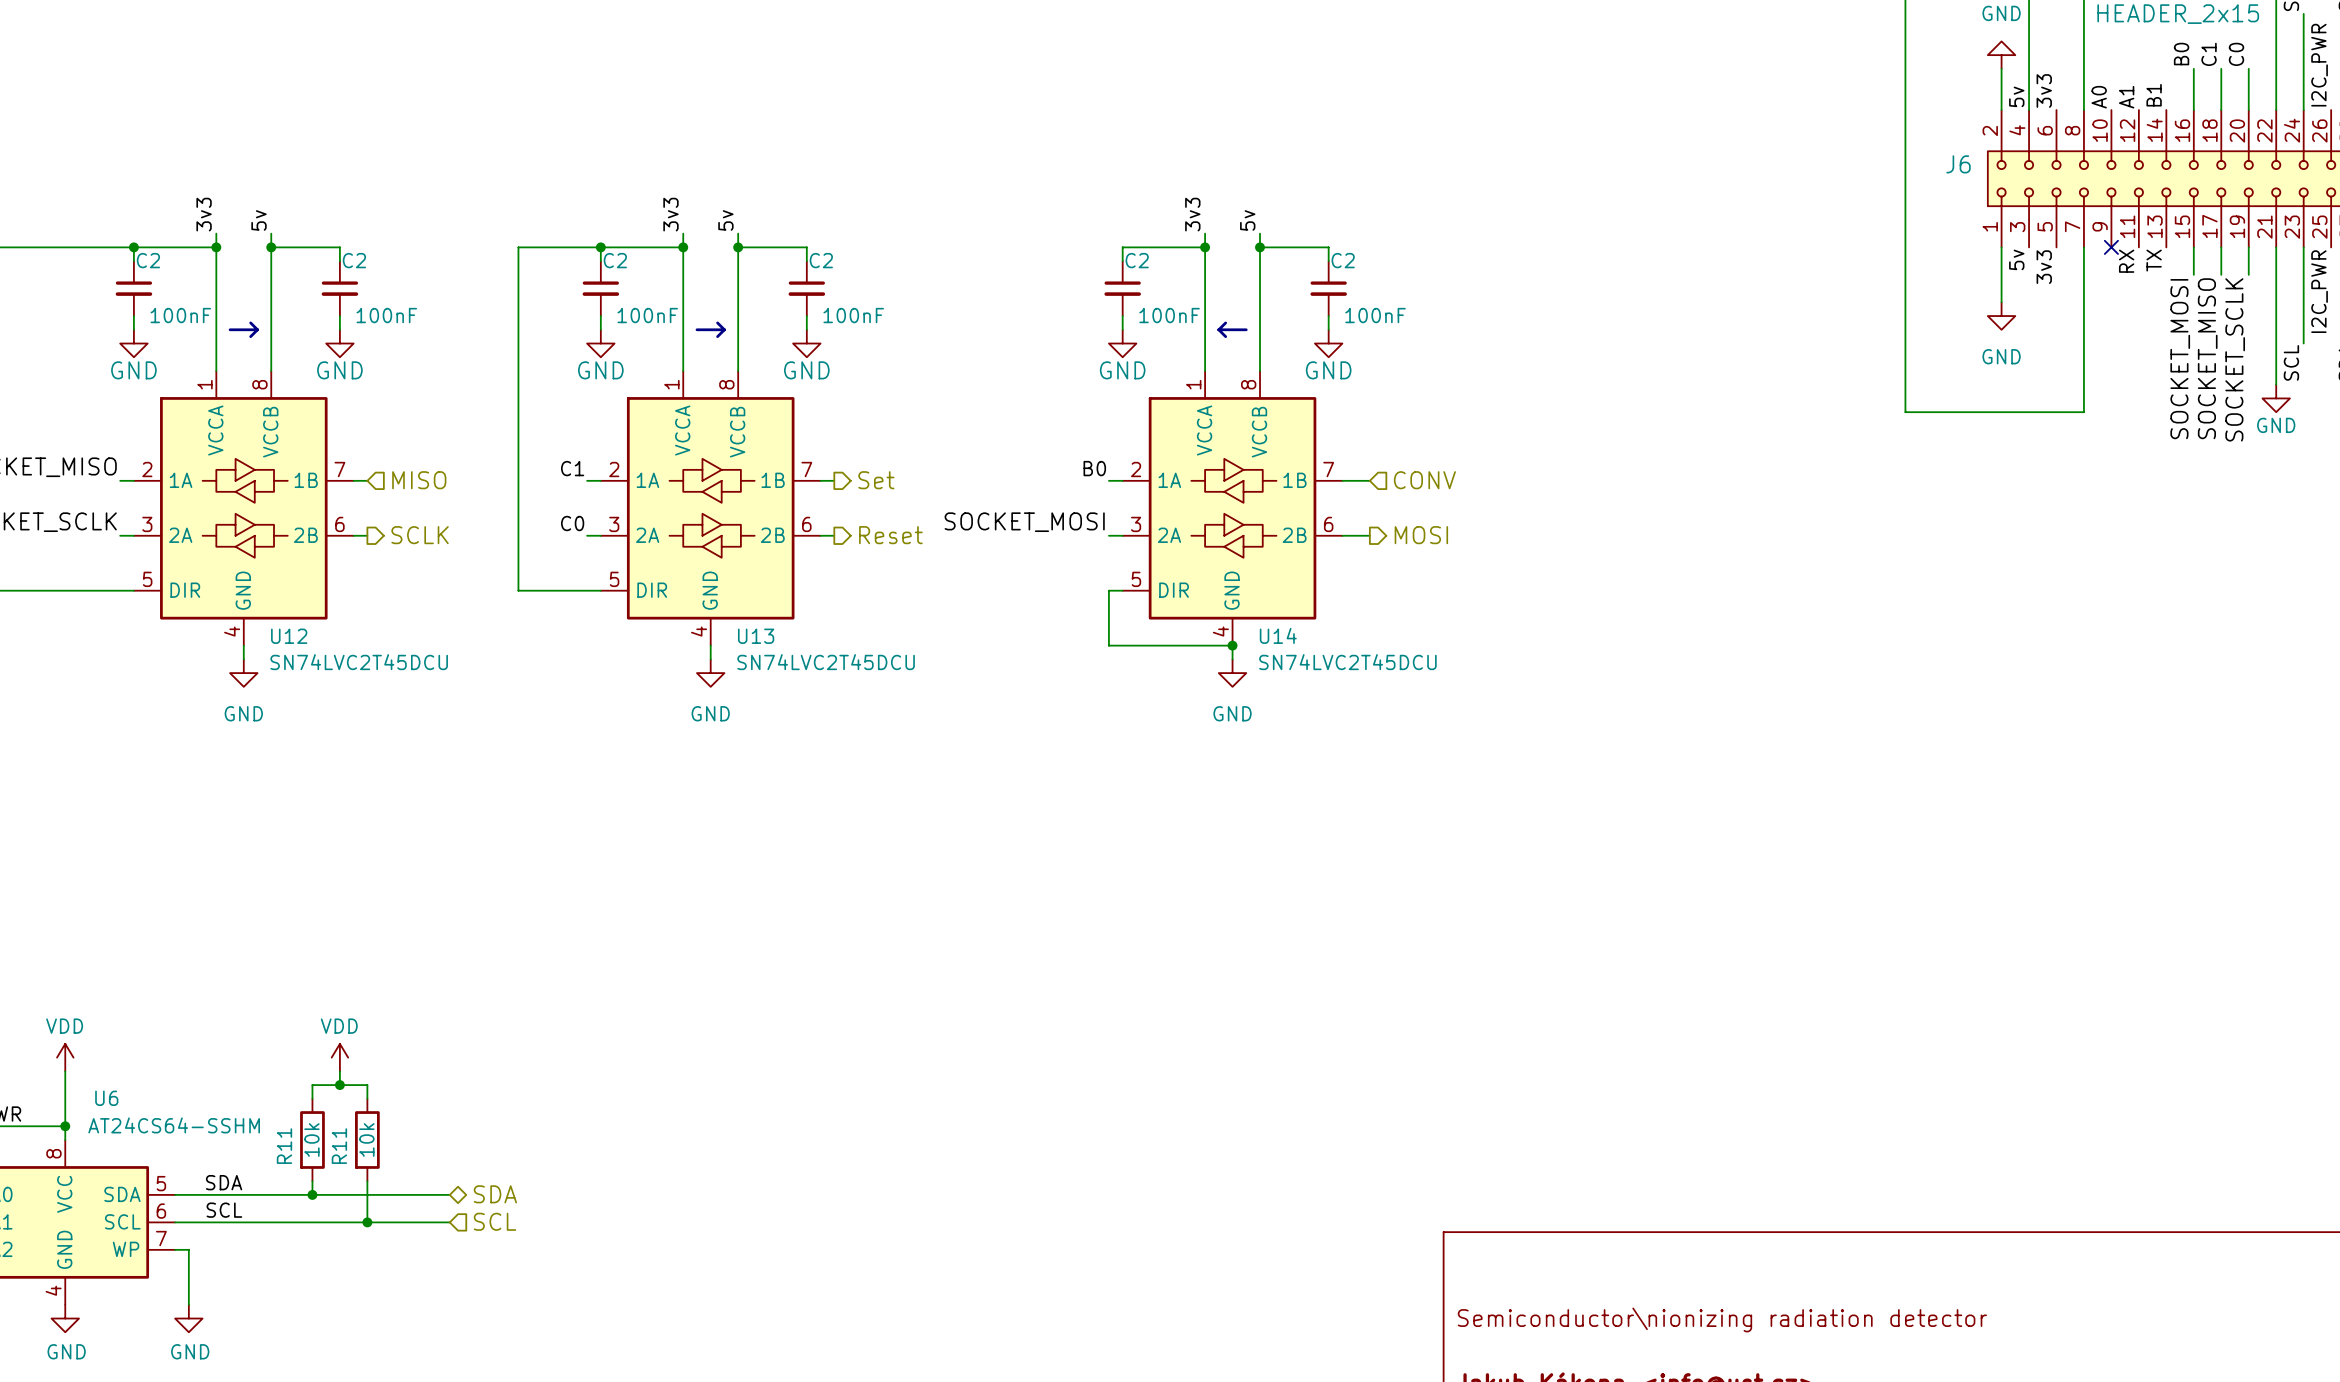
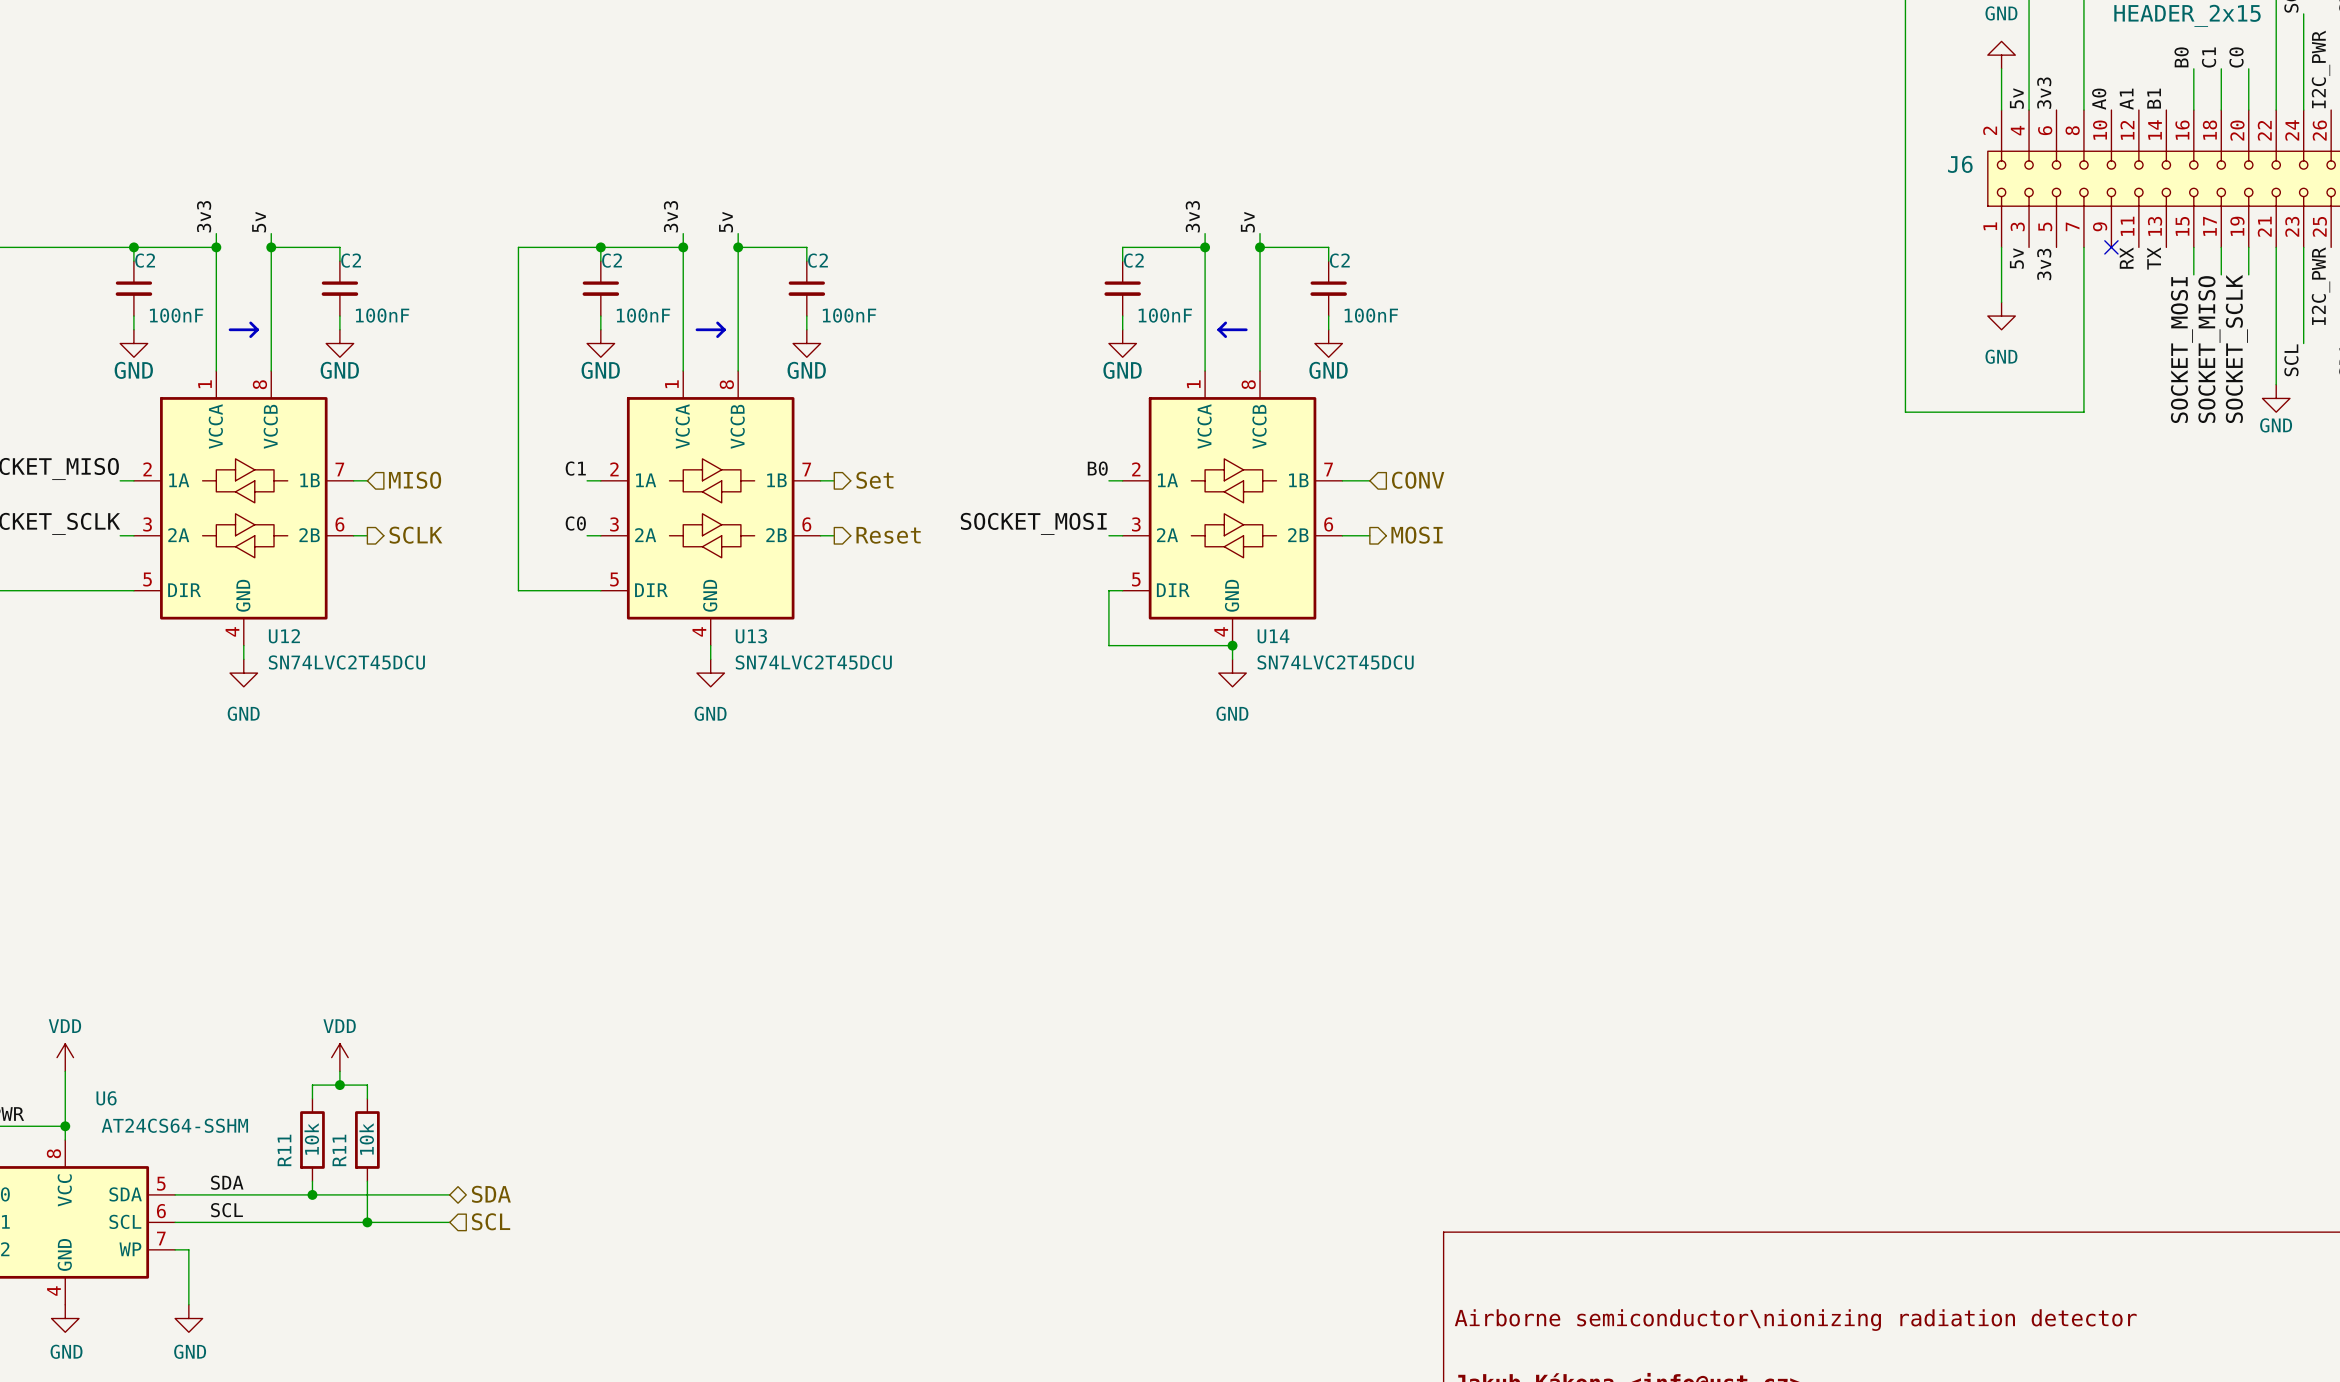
title block: Semiconductor\nionizing radiation detector (1722, 1319) -> Airborne semiconductor\nionizing radiation detector (1795, 1320)

